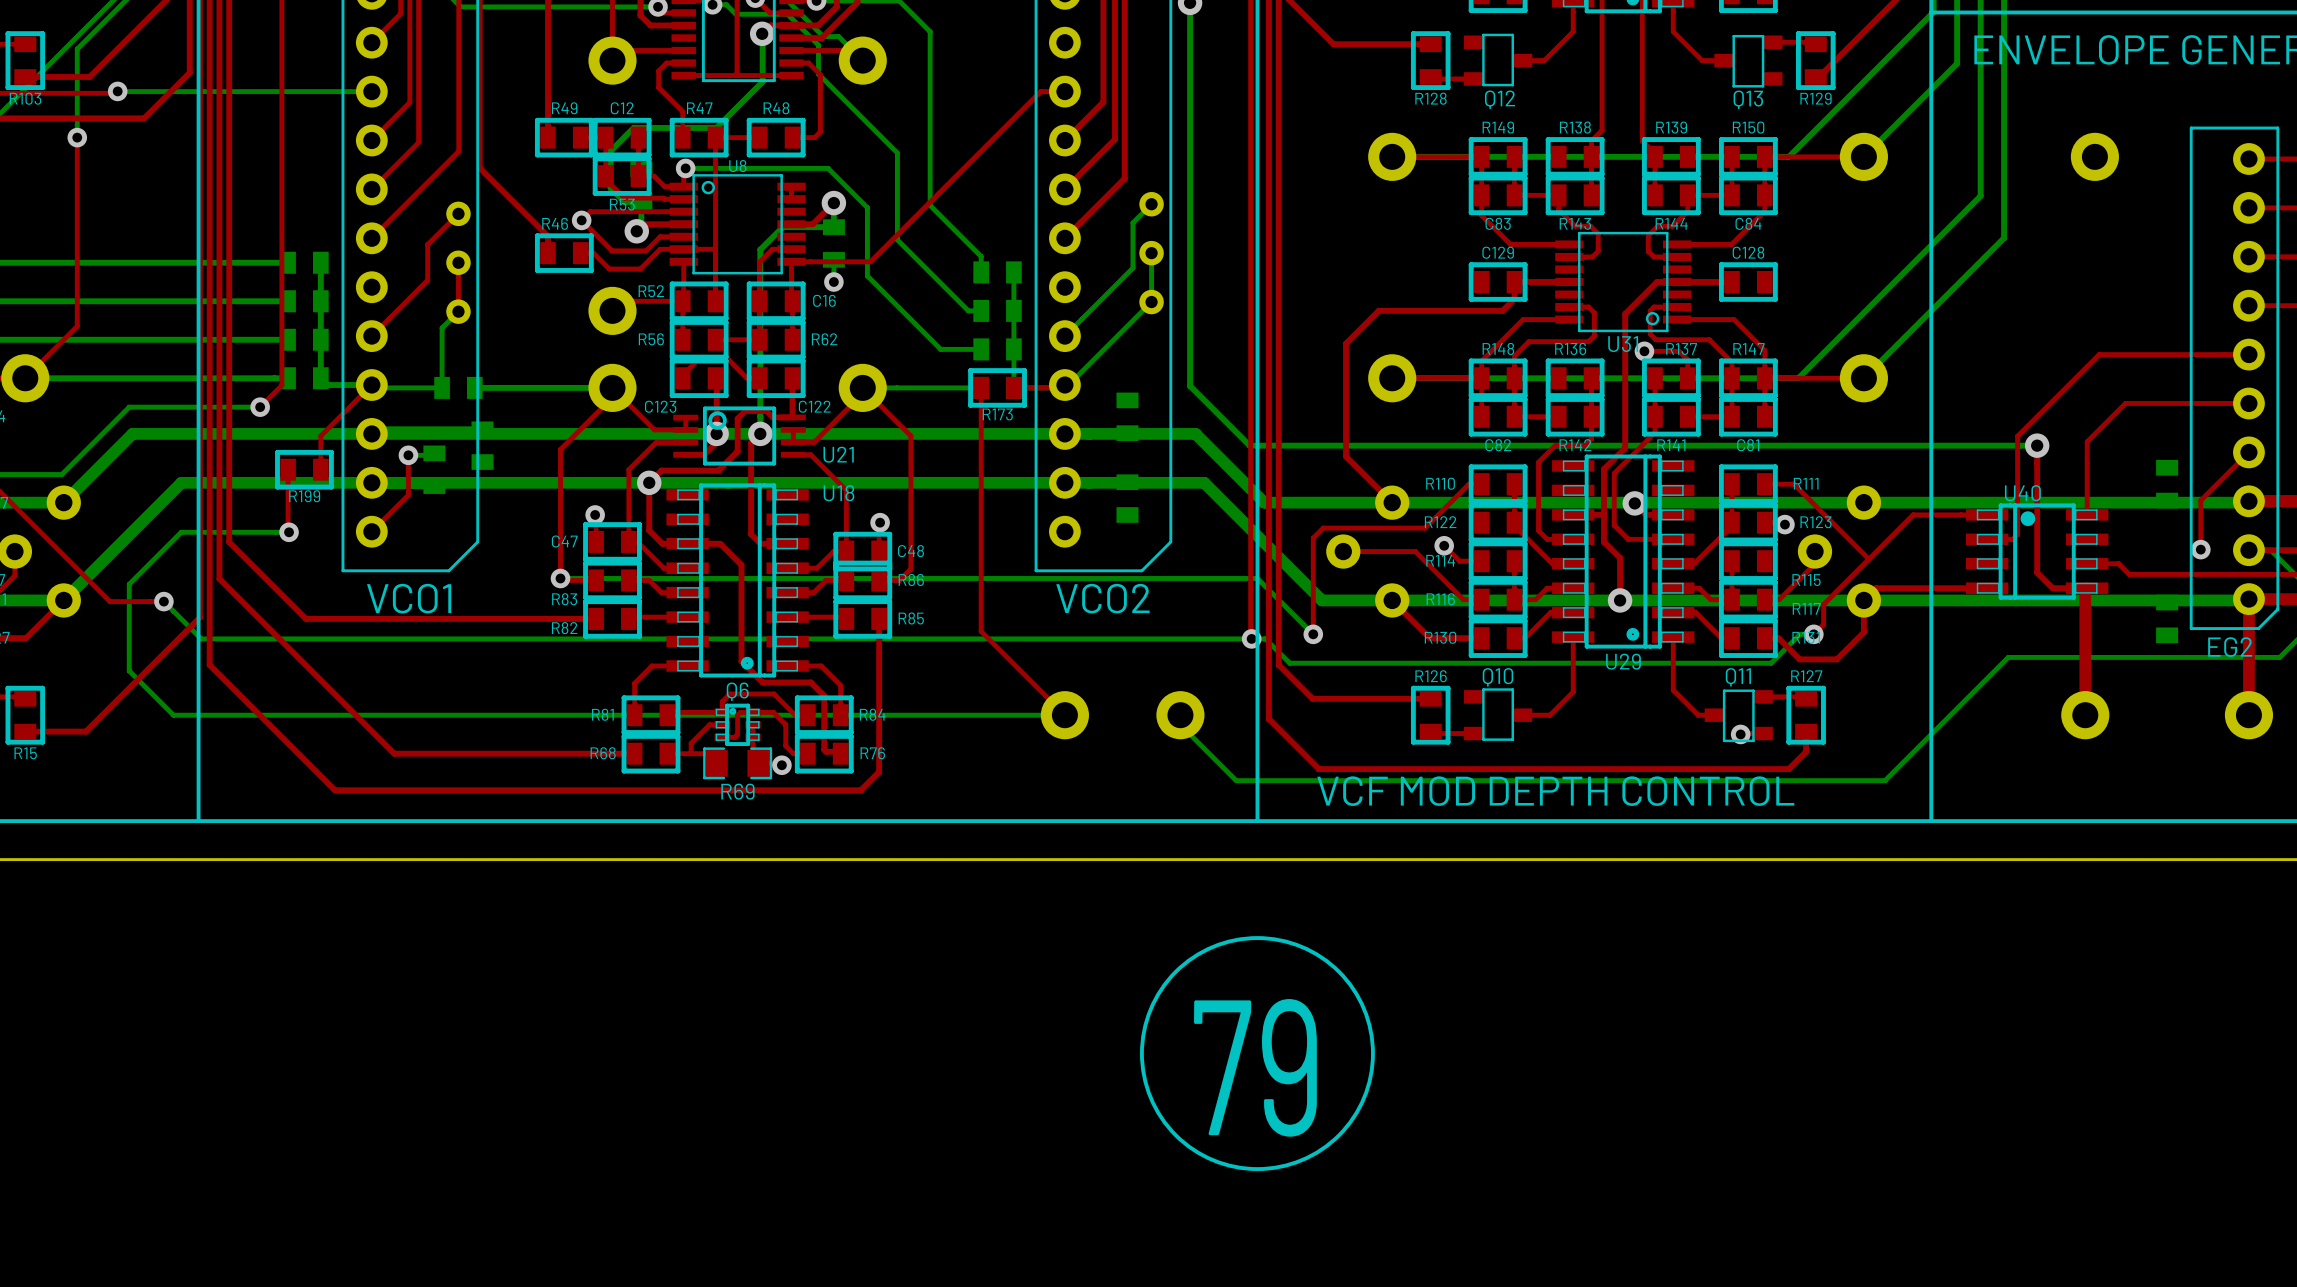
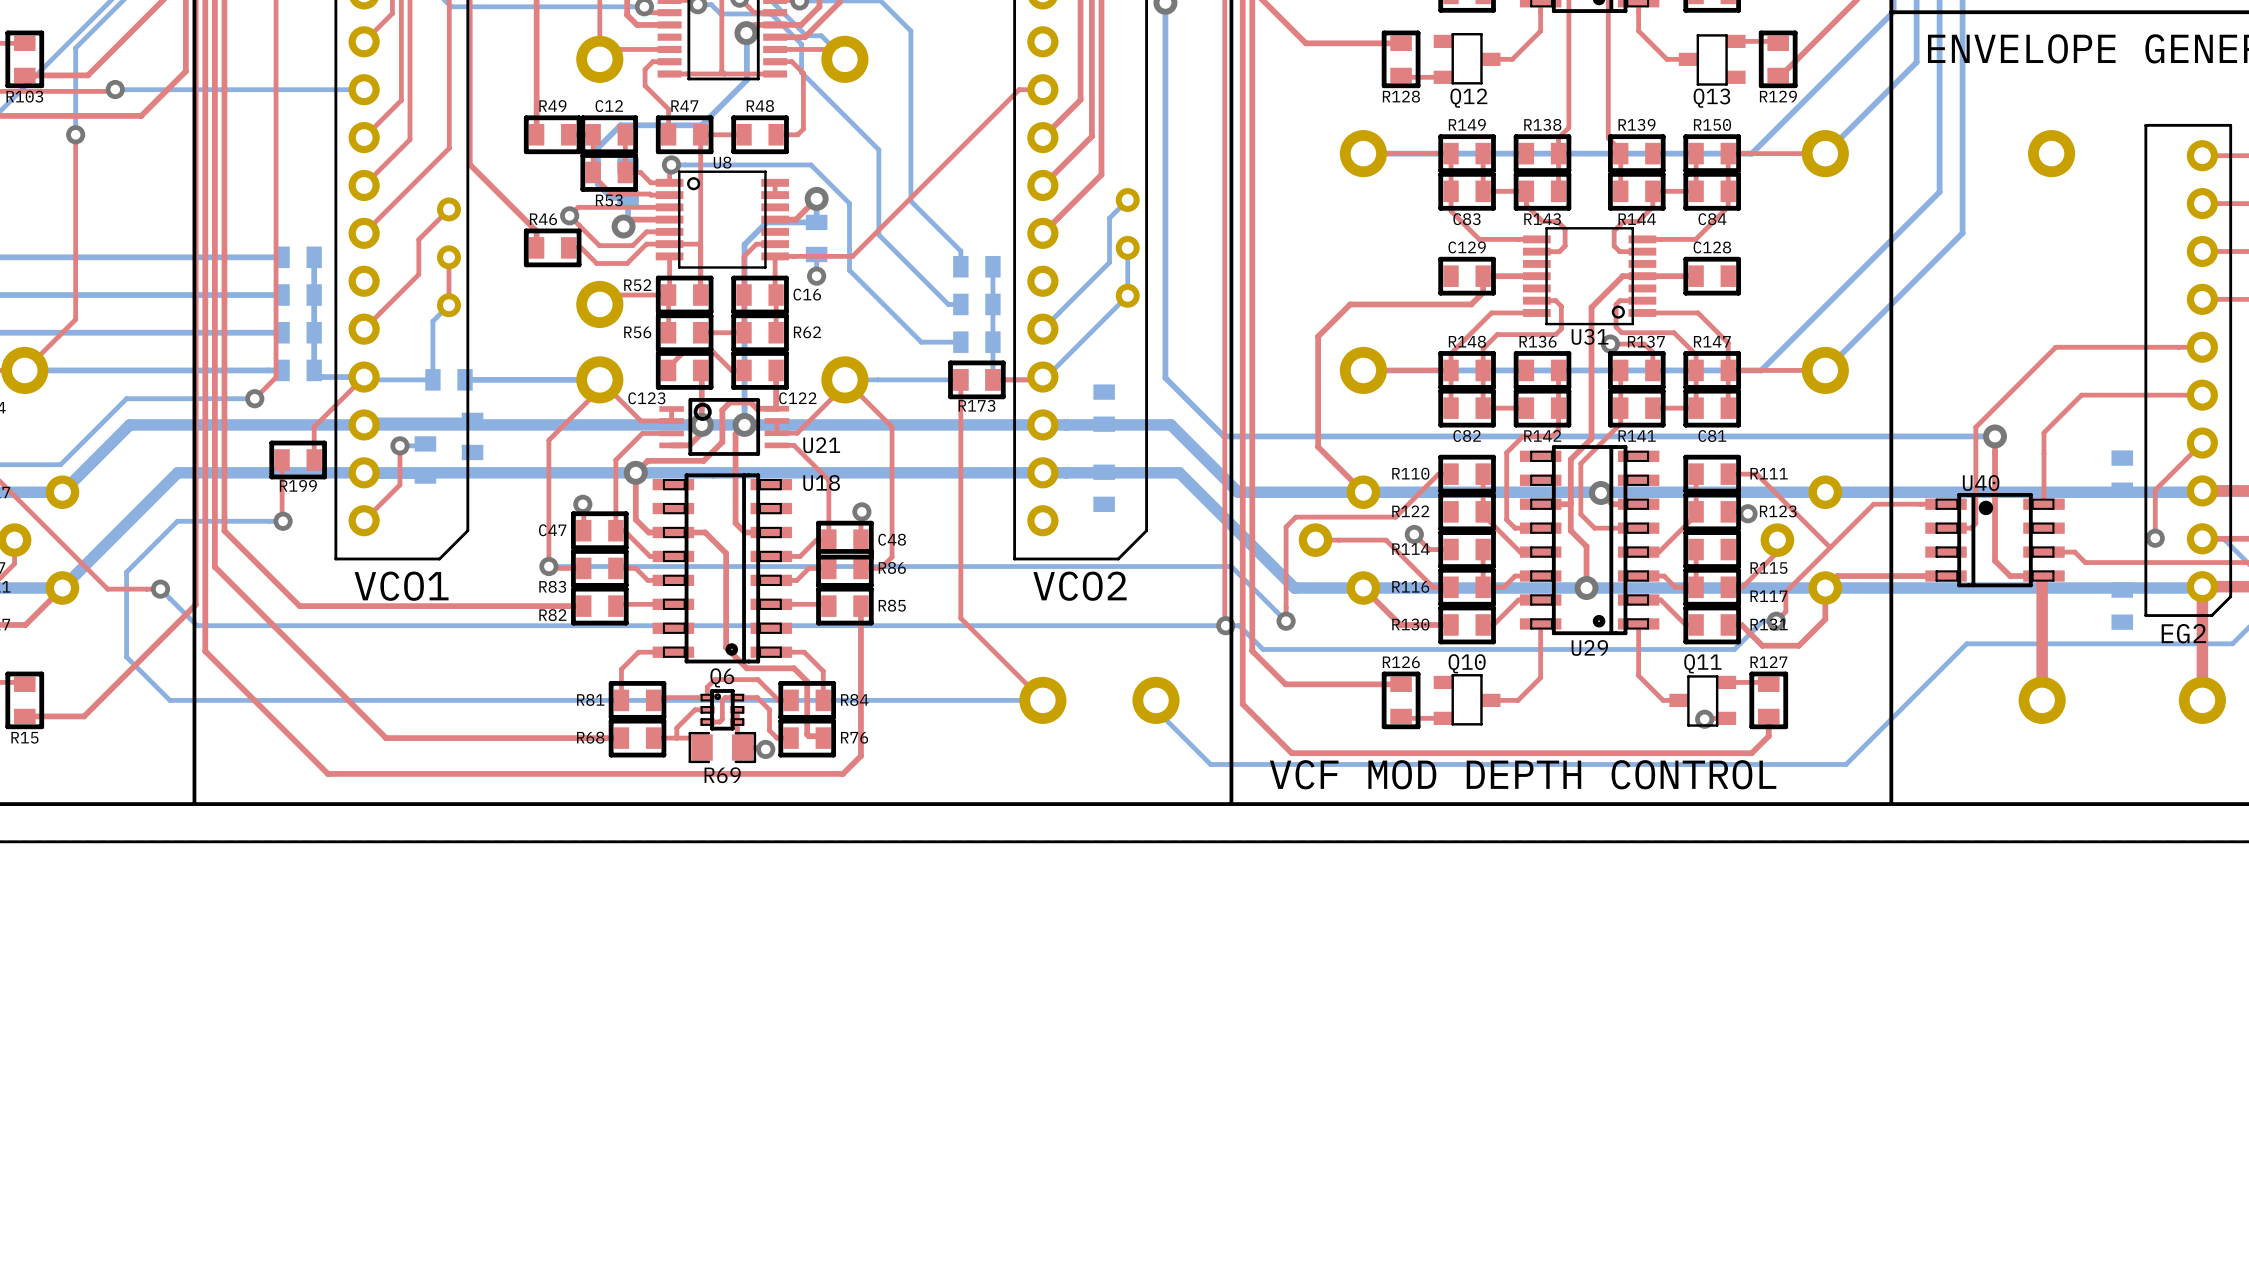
drawing: [1140, 936, 1375, 1171] -> none

